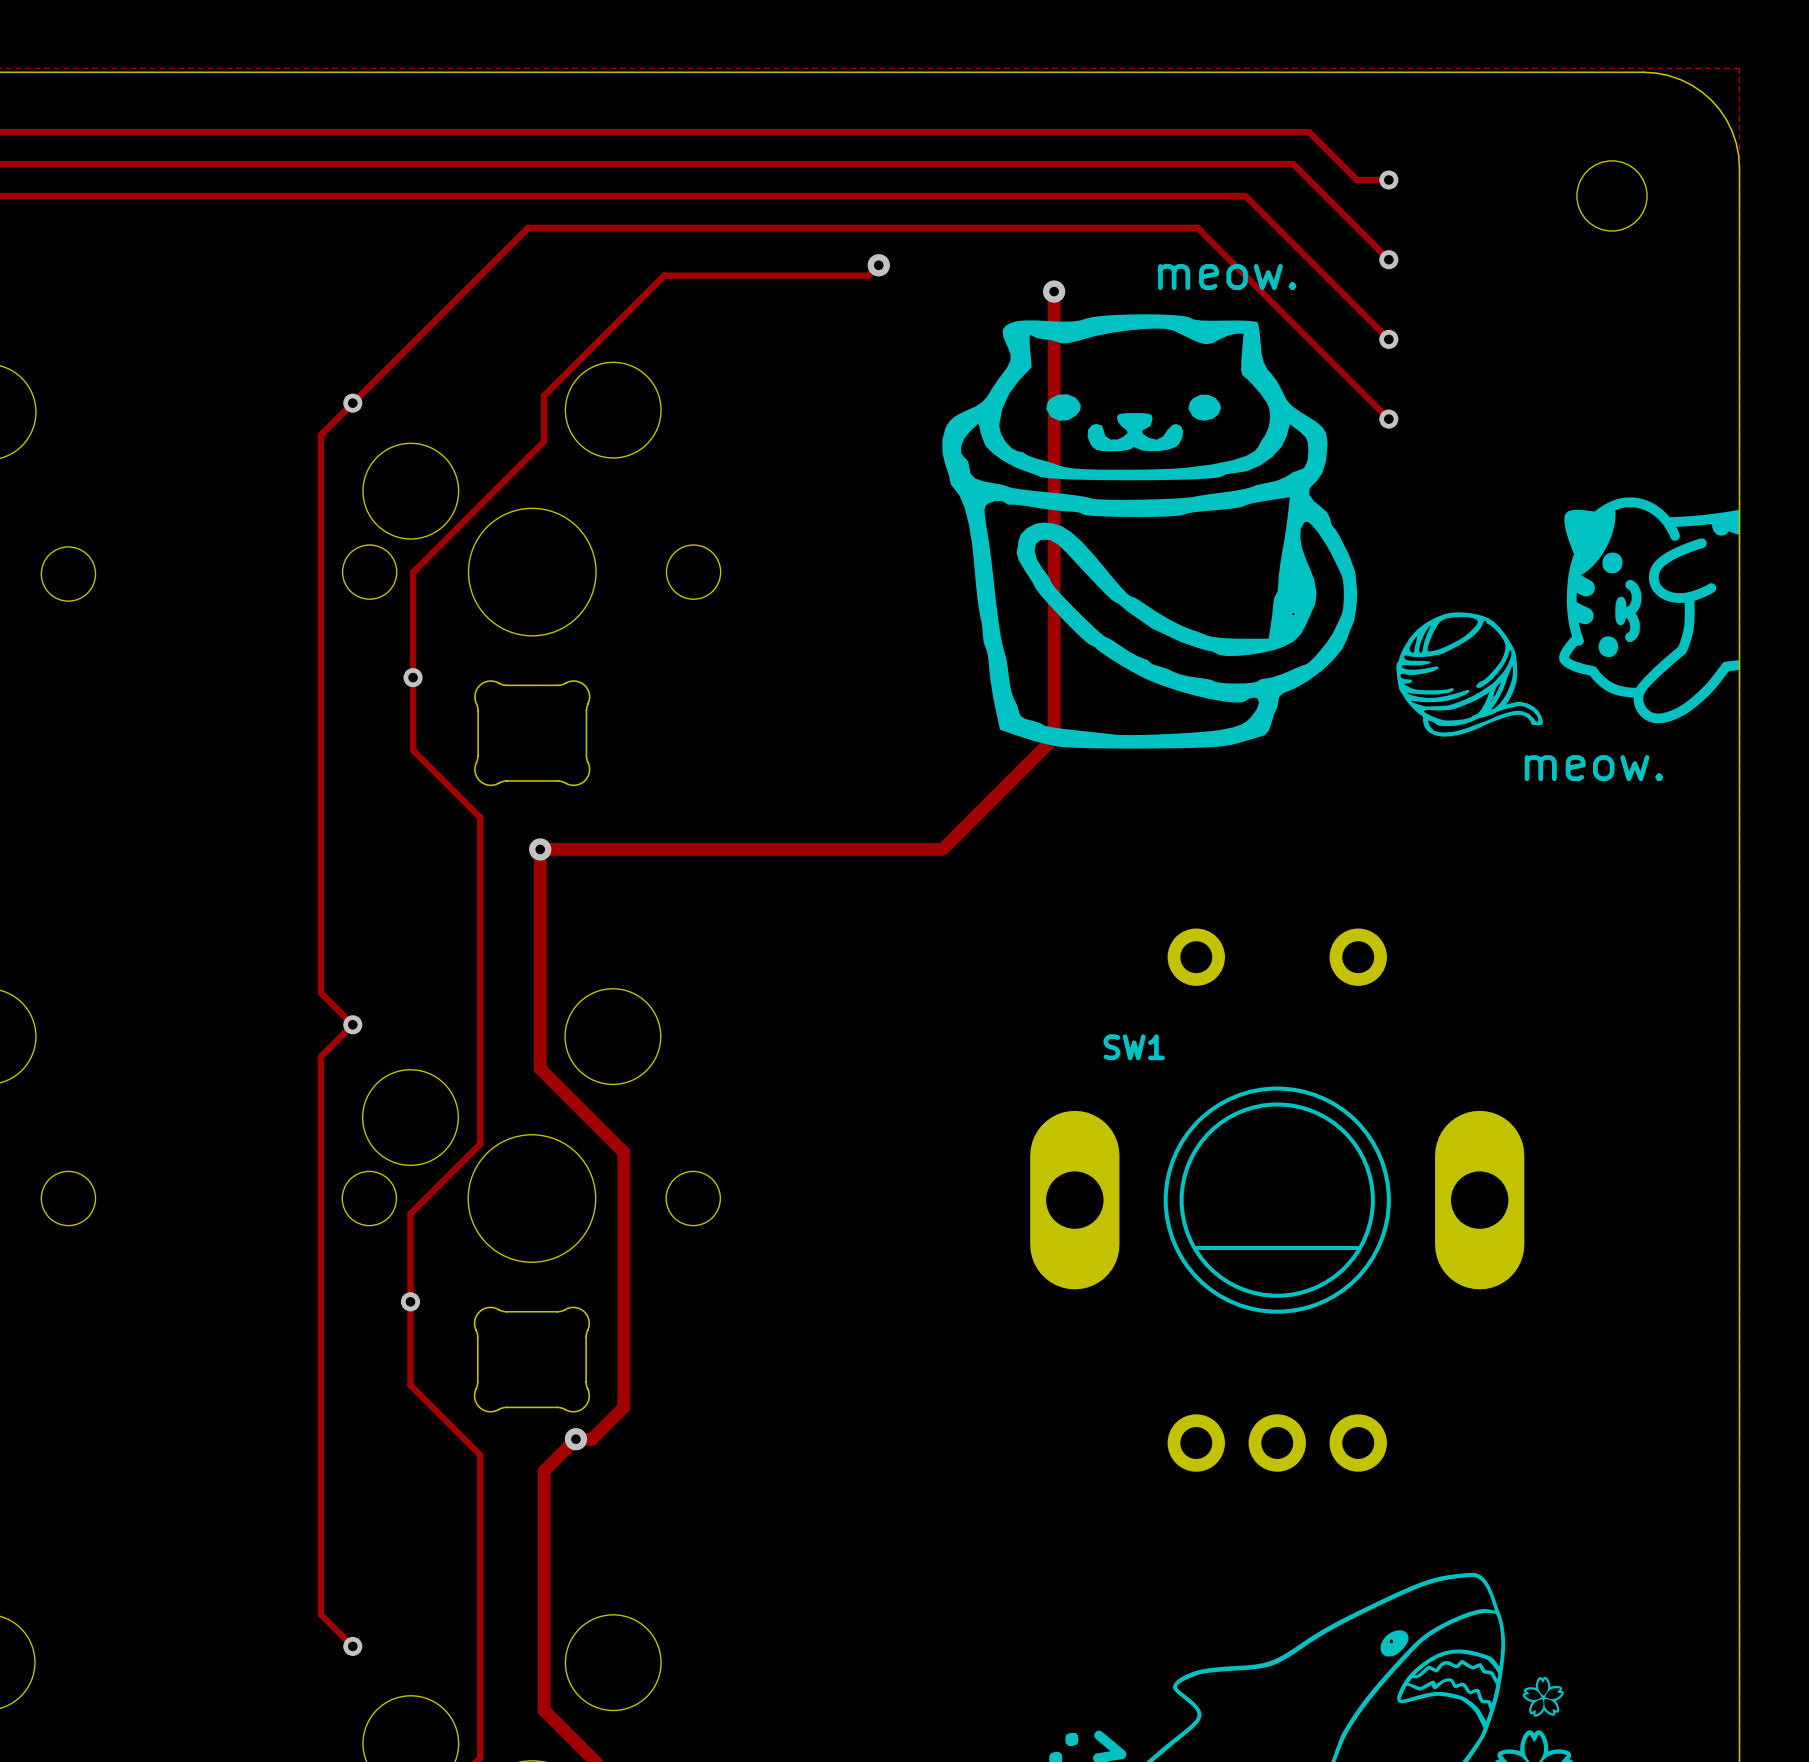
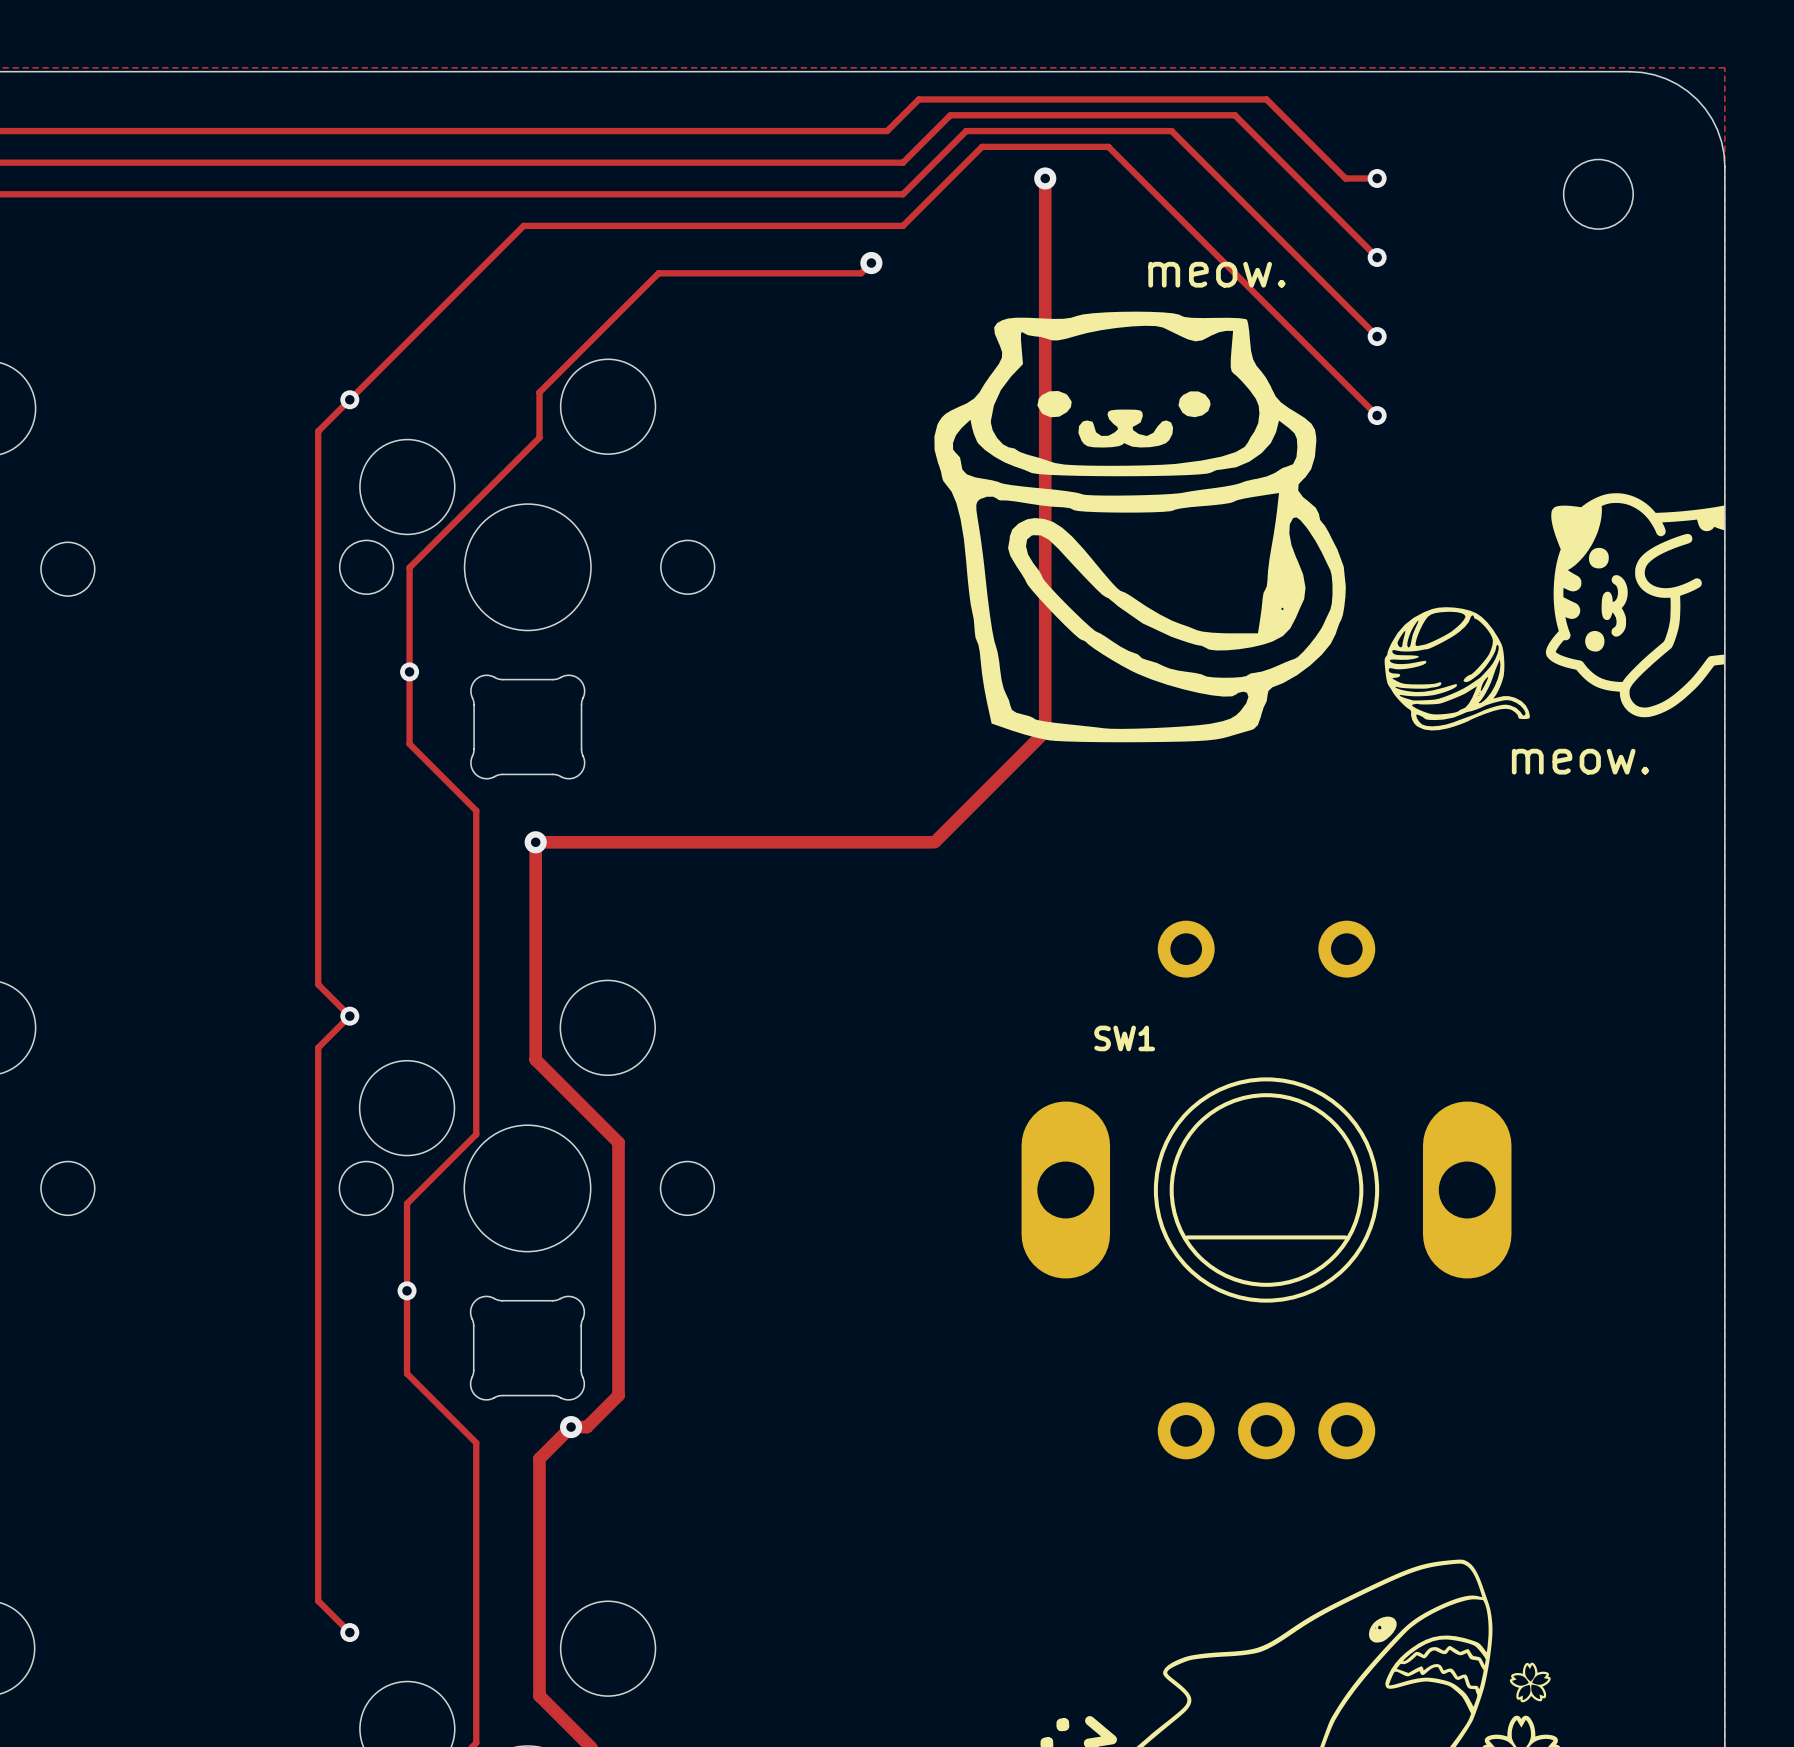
track: (894, 132) (974, 132) -> (902, 194) (966, 131)
track: none -> (887, 131) (918, 99) (1266, 99) (1298, 131)
track: (1181, 132) (1309, 132) -> (1171, 131) (1234, 194)
track: (910, 164) (1293, 164) -> (902, 162) (950, 115) (1234, 115) (1282, 162)
track: none -> (1045, 178) (1045, 289)
track: (910, 195) (1245, 195) -> none
track: (910, 227) (1197, 227) -> (902, 225) (982, 146) (1108, 146) (1187, 225)
via position: (1054, 291) -> (1045, 178)

